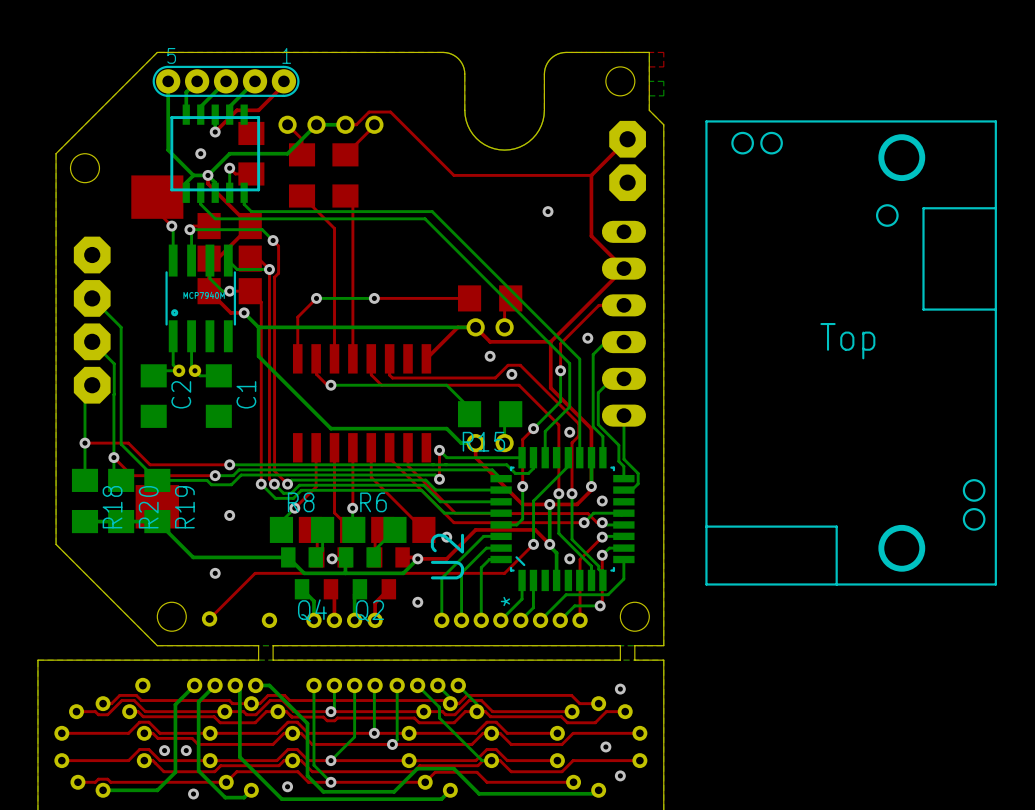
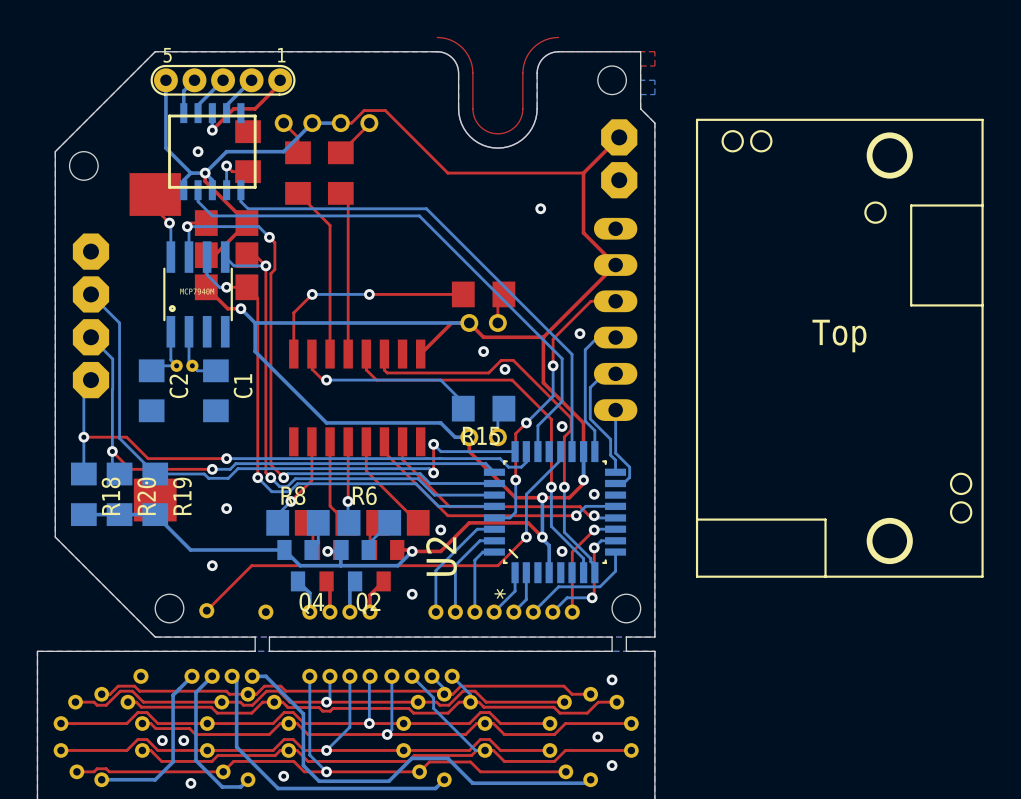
top track: none -> (558, 37) (540, 42) (527, 55) (523, 68) (520, 118) (510, 130) (497, 133) (485, 130) (474, 118) (472, 68) (468, 55) (455, 42) (437, 37)

